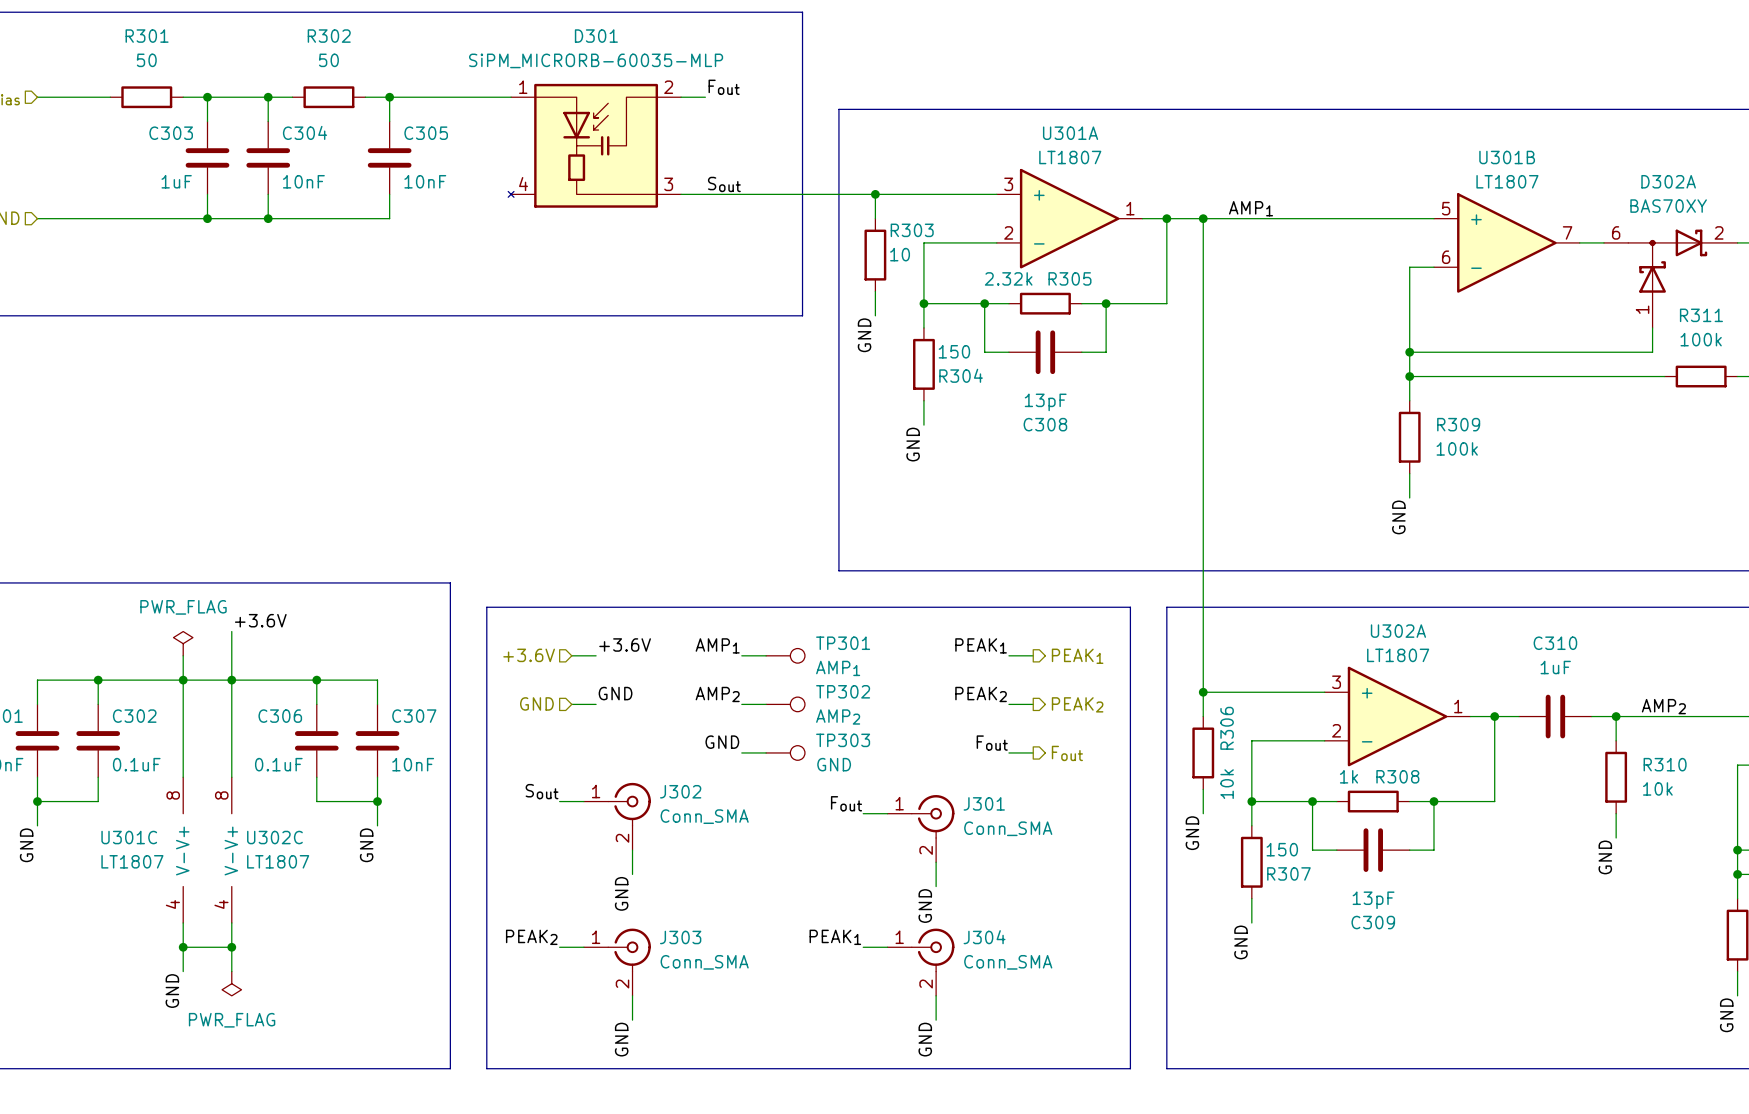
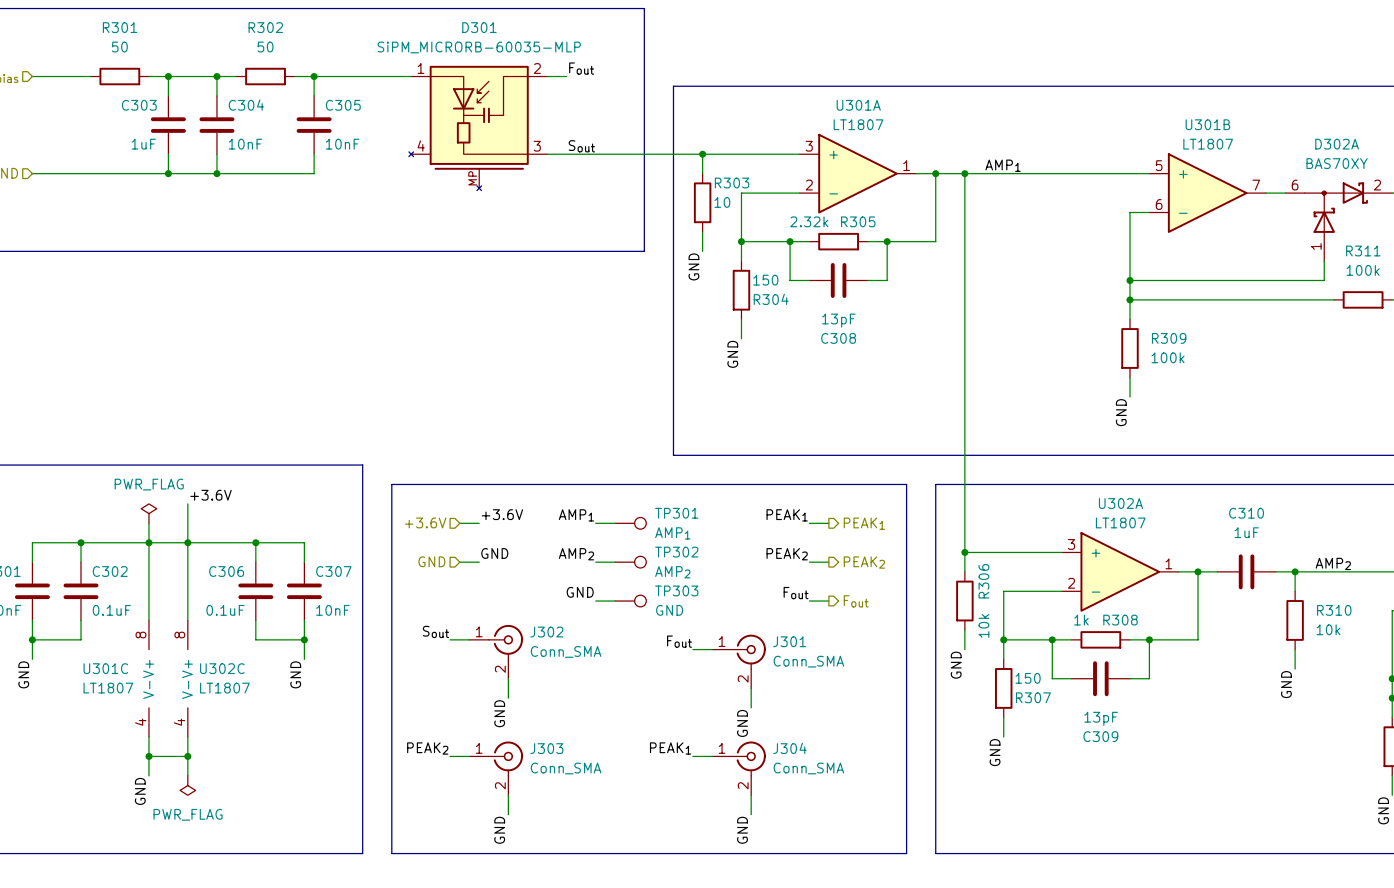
D301 symbol: [508, 83, 682, 208] -> [408, 65, 548, 191]

